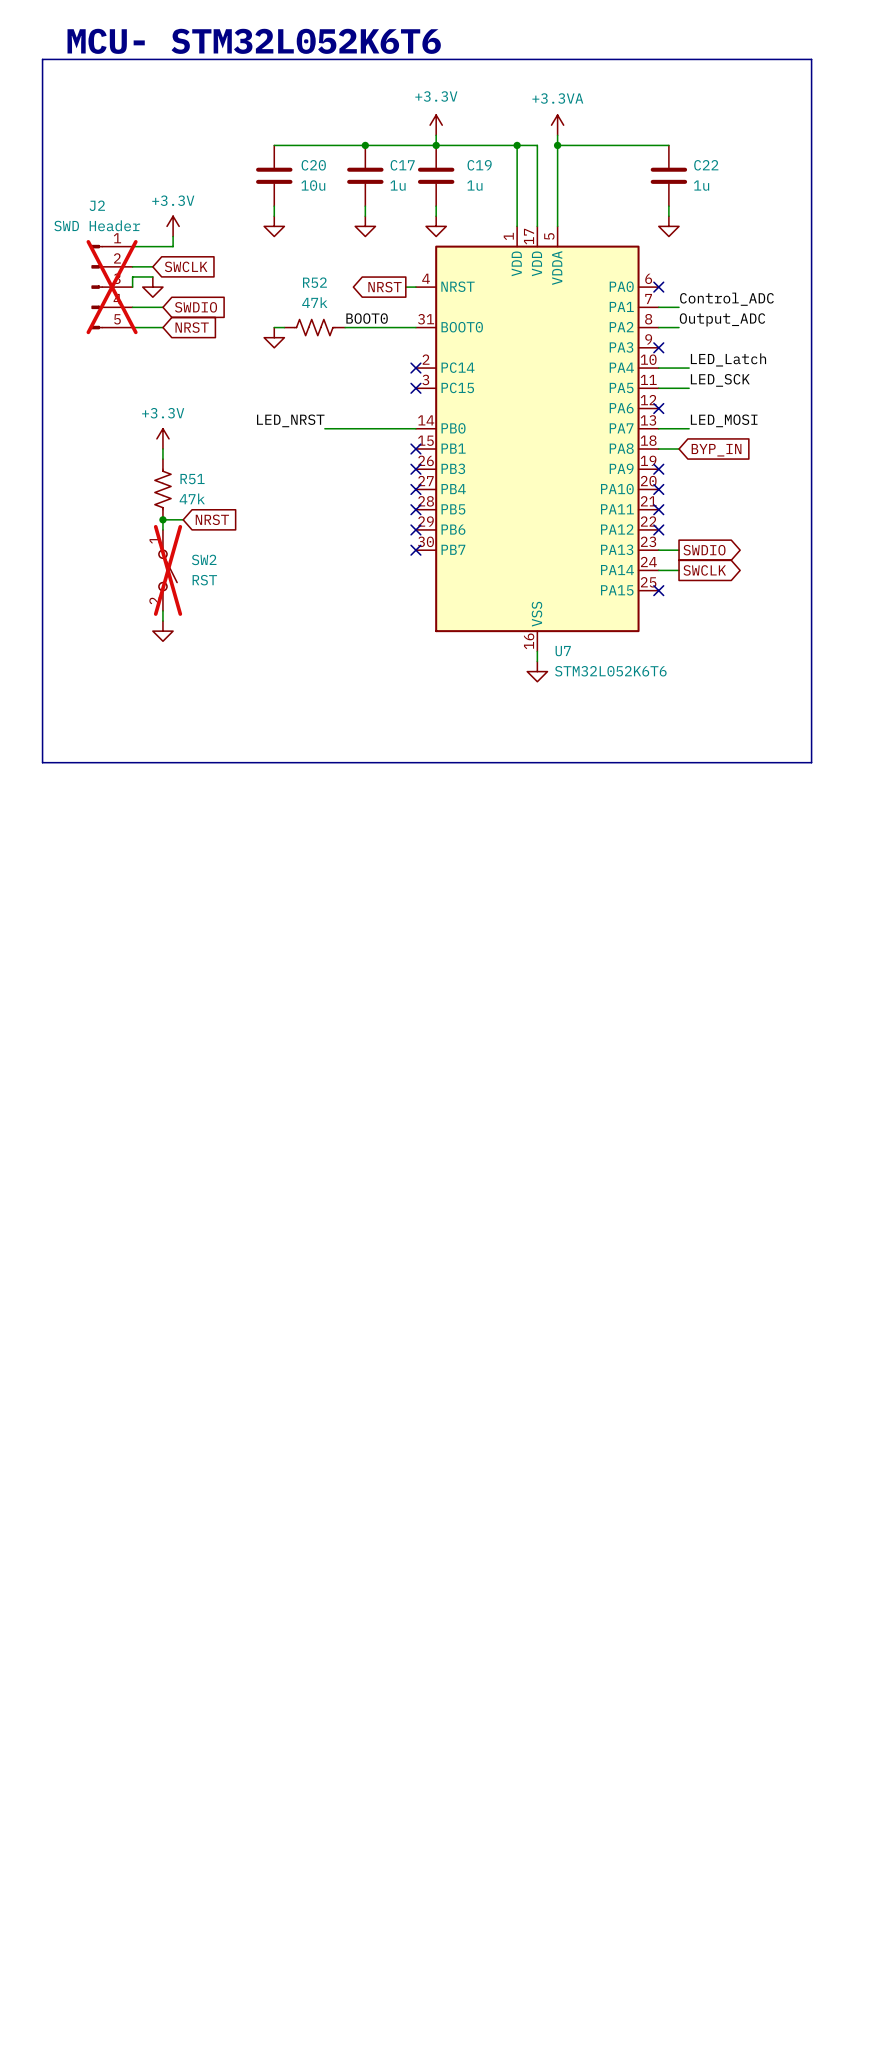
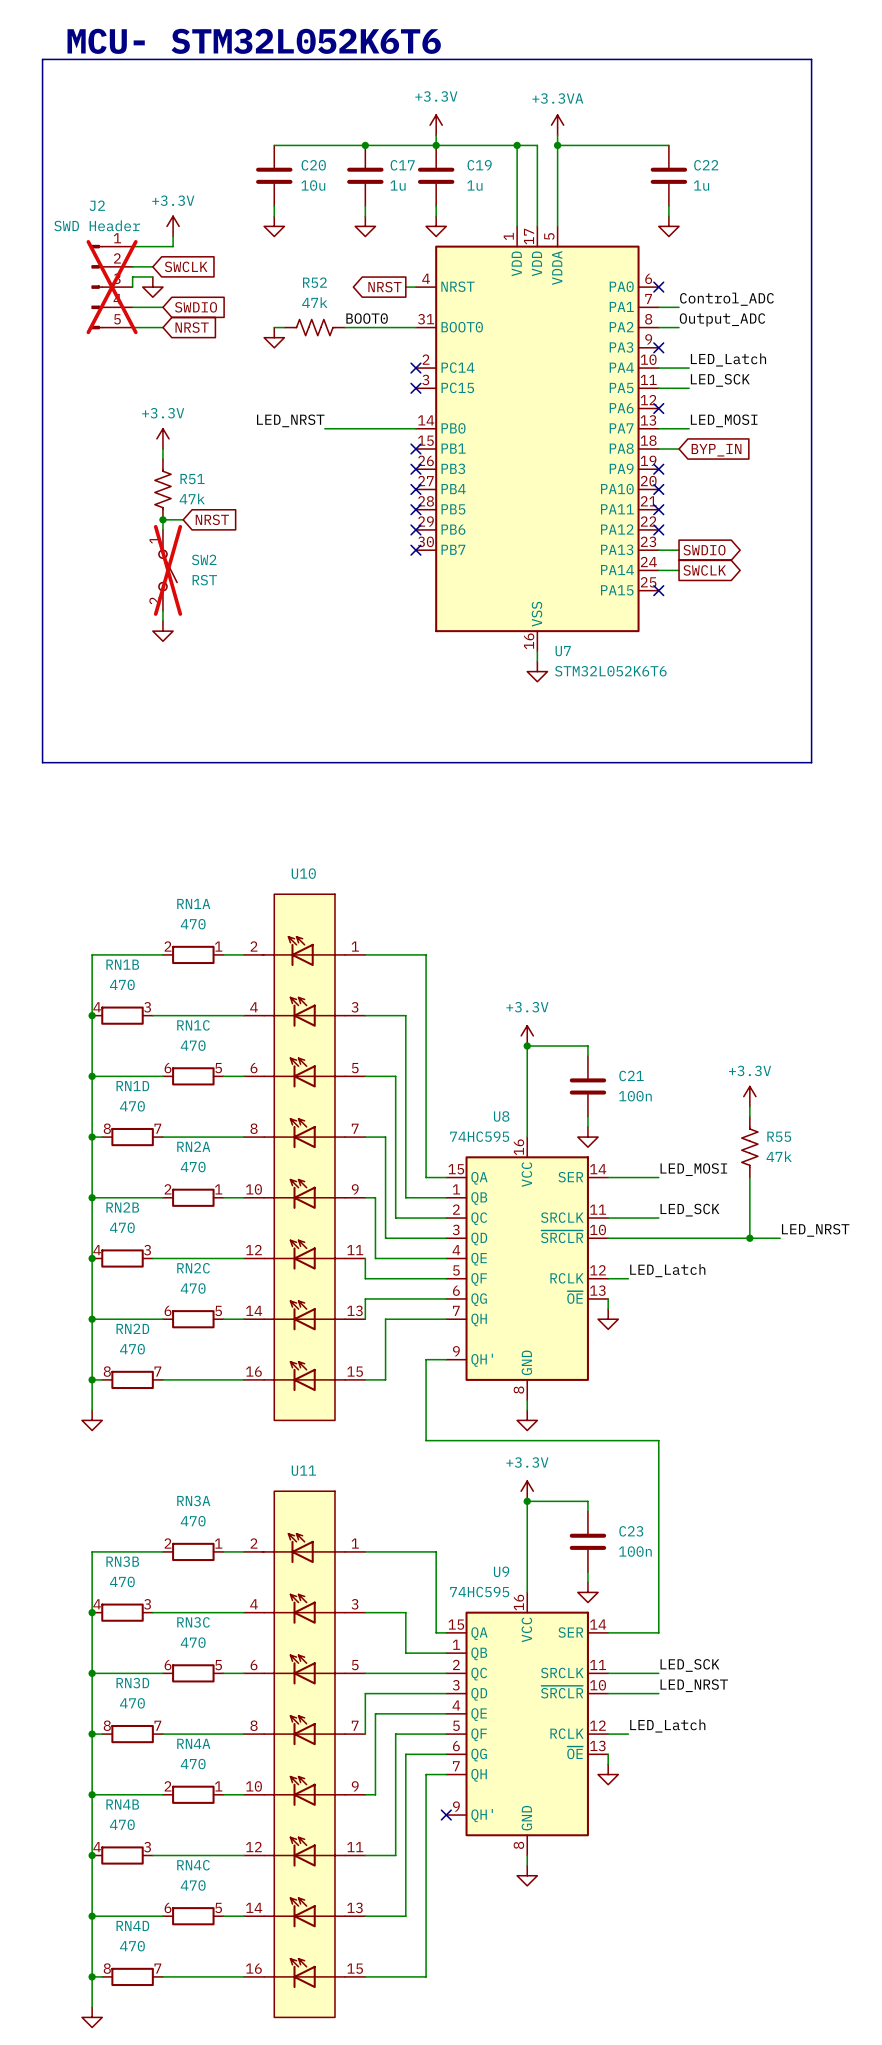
wire: none -> (162, 954) (92, 954) (92, 1410)
RN1A: none -> 470 (193, 954)
wire: none -> (223, 954) (243, 954)
wire: none -> (365, 954) (426, 954) (426, 1177) (446, 1177)
junction: none -> (92, 1015)
RN1B: none -> 470 (122, 1015)
wire: none -> (152, 1015) (243, 1015)
wire: none -> (365, 1015) (405, 1015) (405, 1197) (446, 1197)
power symbol: none -> +3.3V (527, 1035)
junction: none -> (527, 1046)
wire: none -> (587, 1056) (587, 1046) (527, 1046) (527, 1137)
wire: none -> (92, 1076) (162, 1076)
junction: none -> (92, 1076)
RN1C: none -> 470 (193, 1076)
wire: none -> (223, 1076) (243, 1076)
wire: none -> (365, 1076) (395, 1076) (395, 1218) (446, 1218)
C21: none -> 100n (587, 1086)
power symbol: none -> +3.3V (749, 1096)
wire: none -> (749, 1106) (749, 1116)
wire: none -> (587, 1116) (587, 1126)
wire: none -> (92, 1137) (102, 1137)
junction: none -> (92, 1137)
RN1D: none -> 470 (132, 1137)
wire: none -> (162, 1137) (243, 1137)
wire: none -> (365, 1137) (385, 1137) (385, 1238) (446, 1238)
power symbol: none -> (587, 1137)
R55: none -> 47k (749, 1147)
U10: none -> (304, 1157)
label: none -> LED_MOSI (693, 1169)
wire: none -> (608, 1177) (658, 1177)
wire: none -> (749, 1177) (749, 1238)
wire: none -> (92, 1197) (162, 1197)
junction: none -> (92, 1197)
RN2A: none -> 470 (193, 1197)
wire: none -> (223, 1197) (243, 1197)
wire: none -> (365, 1197) (375, 1197) (375, 1258) (446, 1258)
label: none -> LED_SCK (689, 1210)
wire: none -> (608, 1218) (658, 1218)
label: none -> LED_NRST (815, 1230)
wire: none -> (608, 1238) (780, 1238)
junction: none -> (749, 1238)
junction: none -> (92, 1258)
RN2B: none -> 470 (122, 1258)
wire: none -> (152, 1258) (243, 1258)
wire: none -> (365, 1258) (365, 1278) (446, 1278)
U8: none -> 74HC595 (527, 1268)
label: none -> LED_Latch (667, 1270)
wire: none -> (608, 1278) (628, 1278)
wire: none -> (446, 1298) (365, 1298) (365, 1319)
wire: none -> (608, 1298) (608, 1309)
wire: none -> (92, 1319) (162, 1319)
junction: none -> (92, 1319)
RN2C: none -> 470 (193, 1319)
wire: none -> (223, 1319) (243, 1319)
wire: none -> (446, 1319) (385, 1319) (385, 1379) (365, 1379)
power symbol: none -> (608, 1319)
wire: none -> (446, 1359) (426, 1359) (426, 1440) (658, 1440) (658, 1632) (608, 1632)
wire: none -> (92, 1379) (102, 1379)
junction: none -> (92, 1379)
RN2D: none -> 470 (132, 1379)
wire: none -> (162, 1379) (243, 1379)
wire: none -> (527, 1400) (527, 1410)
power symbol: none -> (92, 1420)
power symbol: none -> (527, 1420)
power symbol: none -> +3.3V (527, 1491)
junction: none -> (527, 1501)
wire: none -> (587, 1511) (587, 1501) (527, 1501) (527, 1592)
C23: none -> 100n (587, 1541)
wire: none -> (162, 1551) (92, 1551) (92, 2007)
RN3A: none -> 470 (193, 1551)
wire: none -> (223, 1551) (243, 1551)
wire: none -> (365, 1551) (436, 1551) (436, 1632) (446, 1632)
wire: none -> (587, 1572) (587, 1582)
power symbol: none -> (587, 1592)
junction: none -> (92, 1612)
RN3B: none -> 470 (122, 1612)
wire: none -> (152, 1612) (243, 1612)
wire: none -> (365, 1612) (405, 1612) (405, 1653) (446, 1653)
label: none -> LED_SCK (689, 1665)
wire: none -> (92, 1673) (162, 1673)
junction: none -> (92, 1673)
RN3C: none -> 470 (193, 1673)
wire: none -> (223, 1673) (243, 1673)
wire: none -> (365, 1673) (446, 1673)
wire: none -> (608, 1673) (658, 1673)
label: none -> LED_NRST (694, 1685)
wire: none -> (446, 1693) (365, 1693) (365, 1734)
wire: none -> (608, 1693) (658, 1693)
wire: none -> (446, 1713) (375, 1713) (375, 1794) (365, 1794)
U9: none -> 74HC595 (527, 1723)
label: none -> LED_Latch (667, 1725)
wire: none -> (92, 1734) (102, 1734)
junction: none -> (92, 1734)
RN3D: none -> 470 (132, 1734)
wire: none -> (162, 1734) (243, 1734)
wire: none -> (446, 1734) (395, 1734) (395, 1855) (365, 1855)
wire: none -> (608, 1734) (628, 1734)
U11: none -> (304, 1754)
wire: none -> (446, 1754) (405, 1754) (405, 1916) (365, 1916)
wire: none -> (608, 1754) (608, 1764)
wire: none -> (446, 1774) (426, 1774) (426, 1976) (365, 1976)
power symbol: none -> (608, 1774)
wire: none -> (92, 1794) (162, 1794)
junction: none -> (92, 1794)
RN4A: none -> 470 (193, 1794)
wire: none -> (223, 1794) (243, 1794)
no-connect mark: none -> (446, 1815)
junction: none -> (92, 1855)
RN4B: none -> 470 (122, 1855)
wire: none -> (152, 1855) (243, 1855)
wire: none -> (527, 1855) (527, 1865)
power symbol: none -> (527, 1875)
wire: none -> (92, 1916) (162, 1916)
junction: none -> (92, 1916)
RN4C: none -> 470 (193, 1916)
wire: none -> (223, 1916) (243, 1916)
wire: none -> (92, 1976) (102, 1976)
junction: none -> (92, 1976)
RN4D: none -> 470 (132, 1976)
wire: none -> (162, 1976) (243, 1976)
power symbol: none -> (92, 2017)

